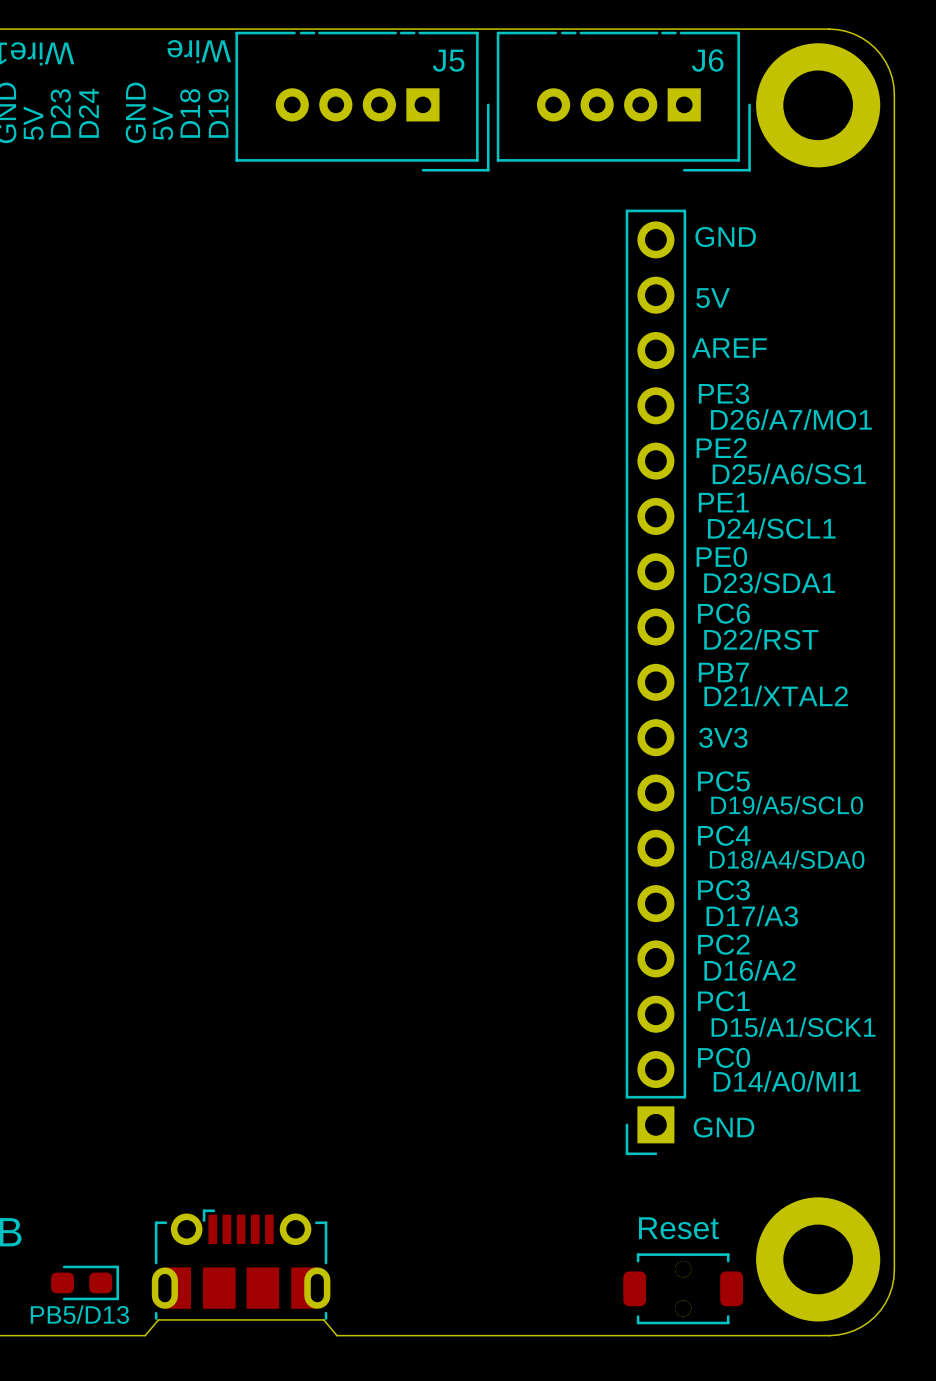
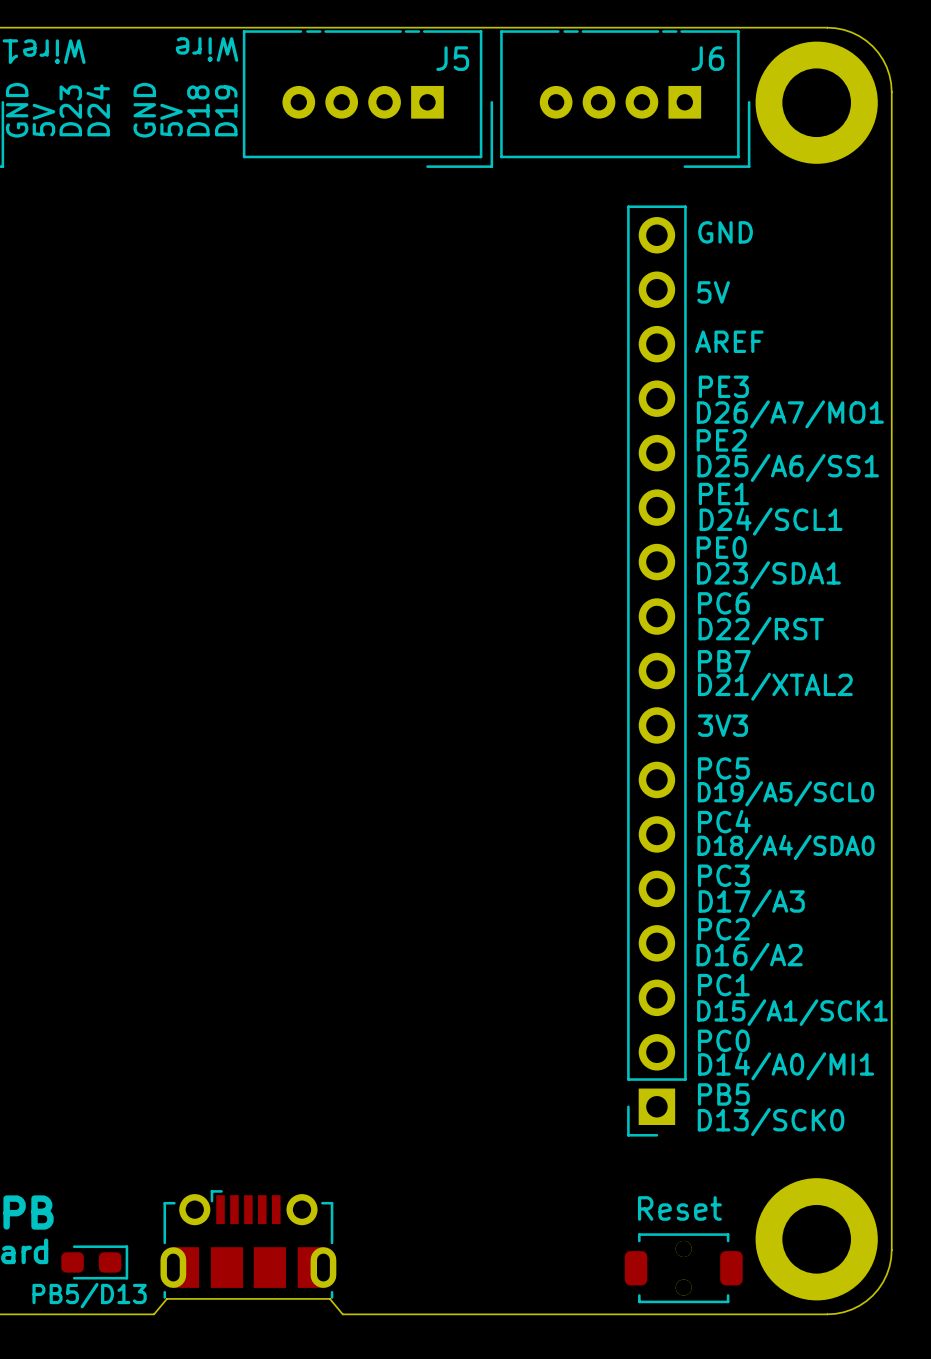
text: GND (724, 1127) -> PB5 (723, 1094)
text: none -> D13/SCK0 (771, 1122)

